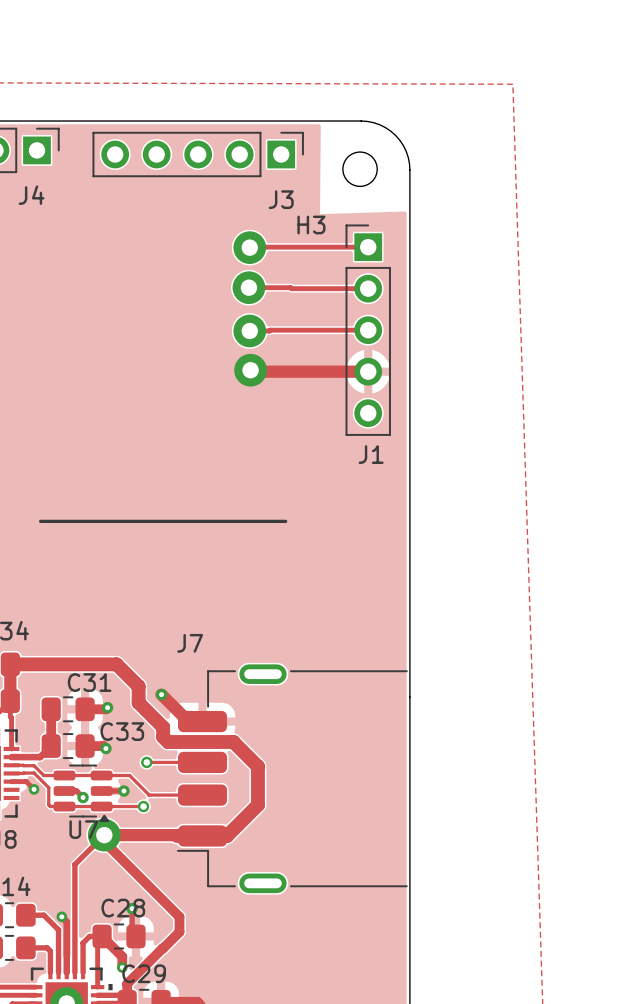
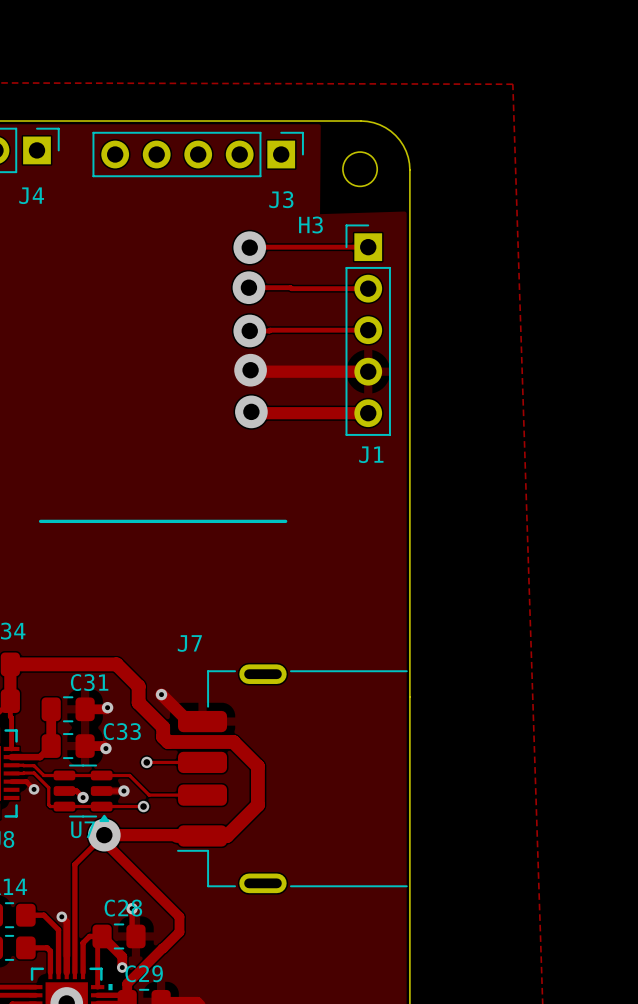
track: none -> (251, 411) (368, 413)
via: none -> (251, 411)

